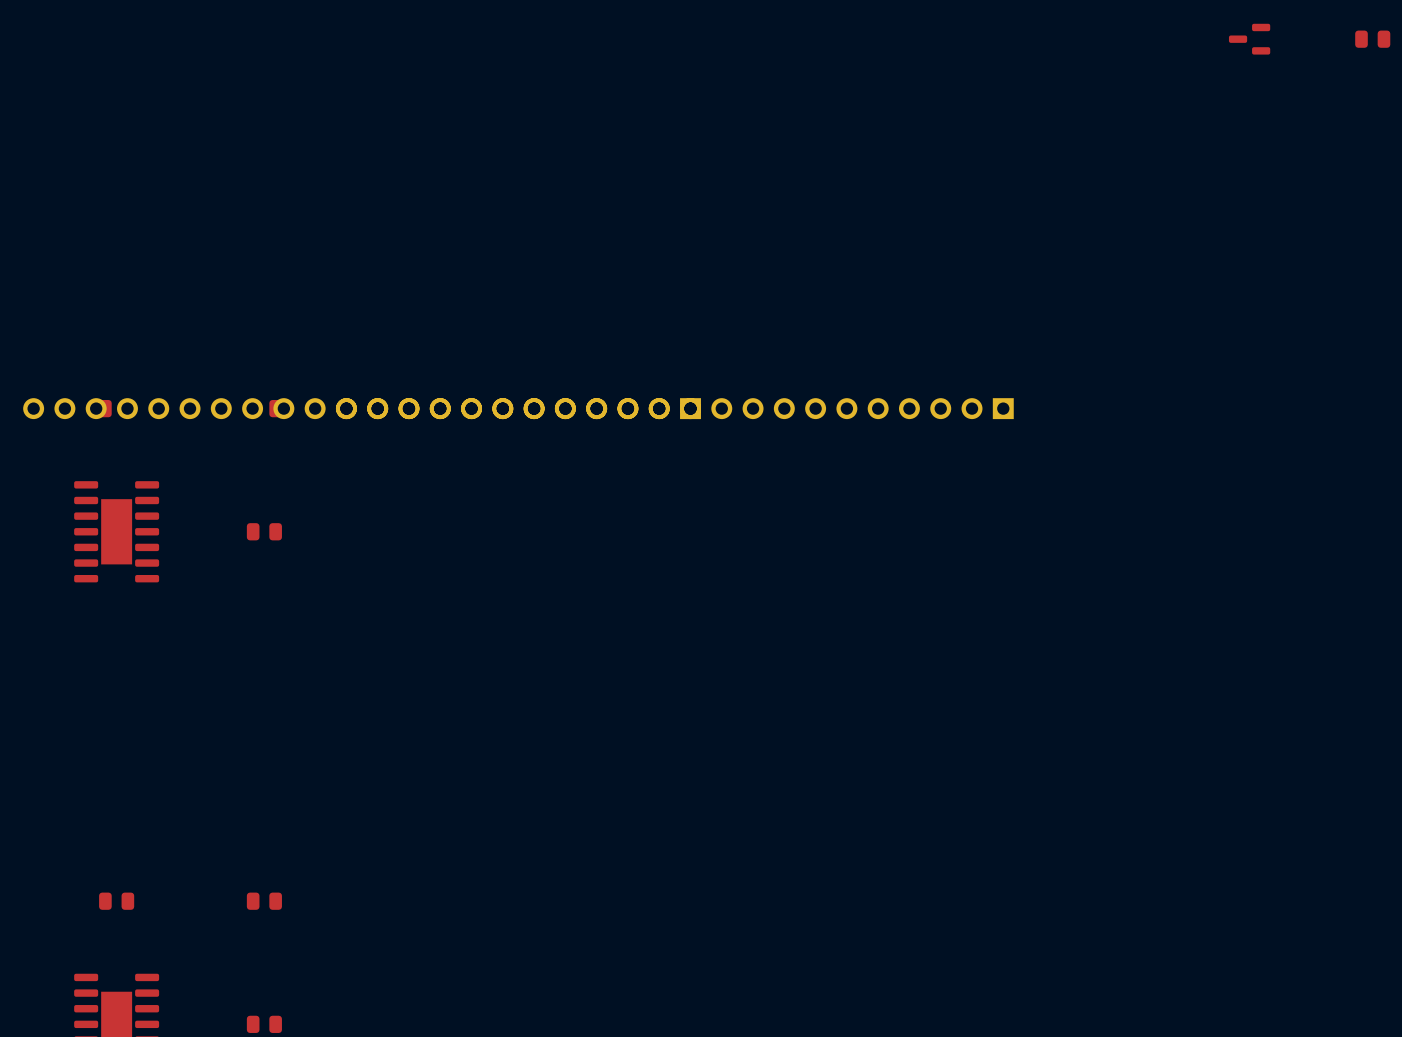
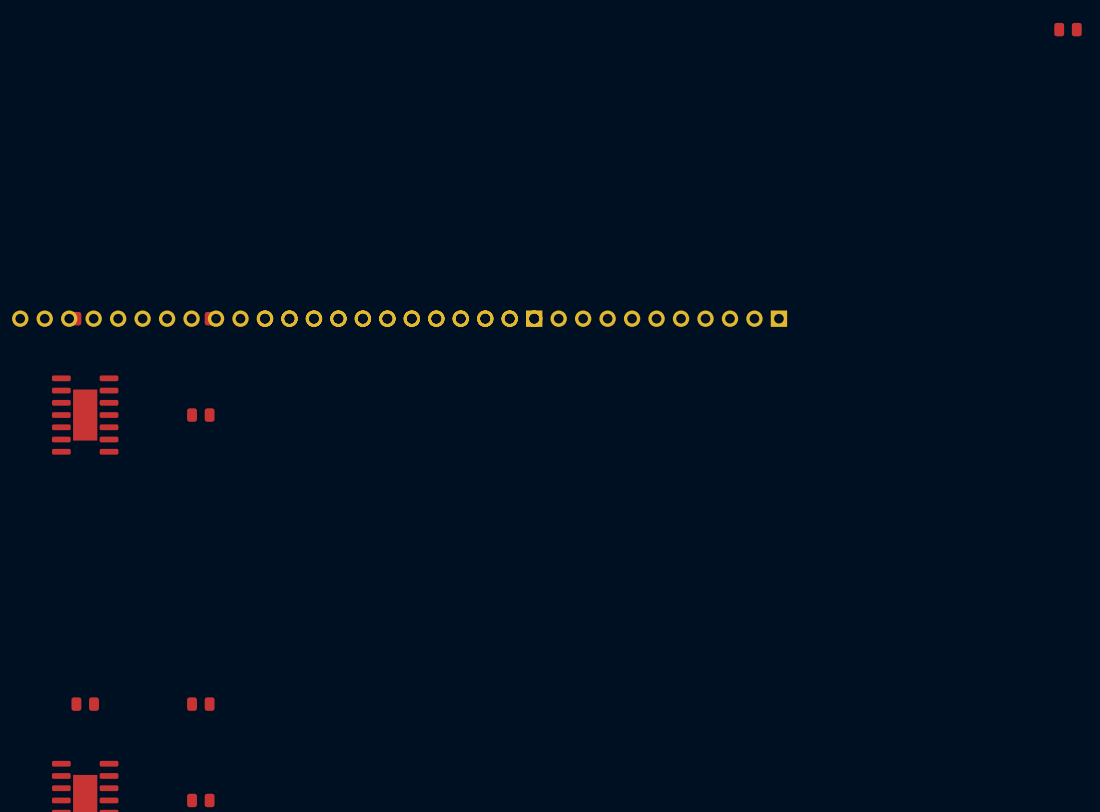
part: (1249, 39) -> none

